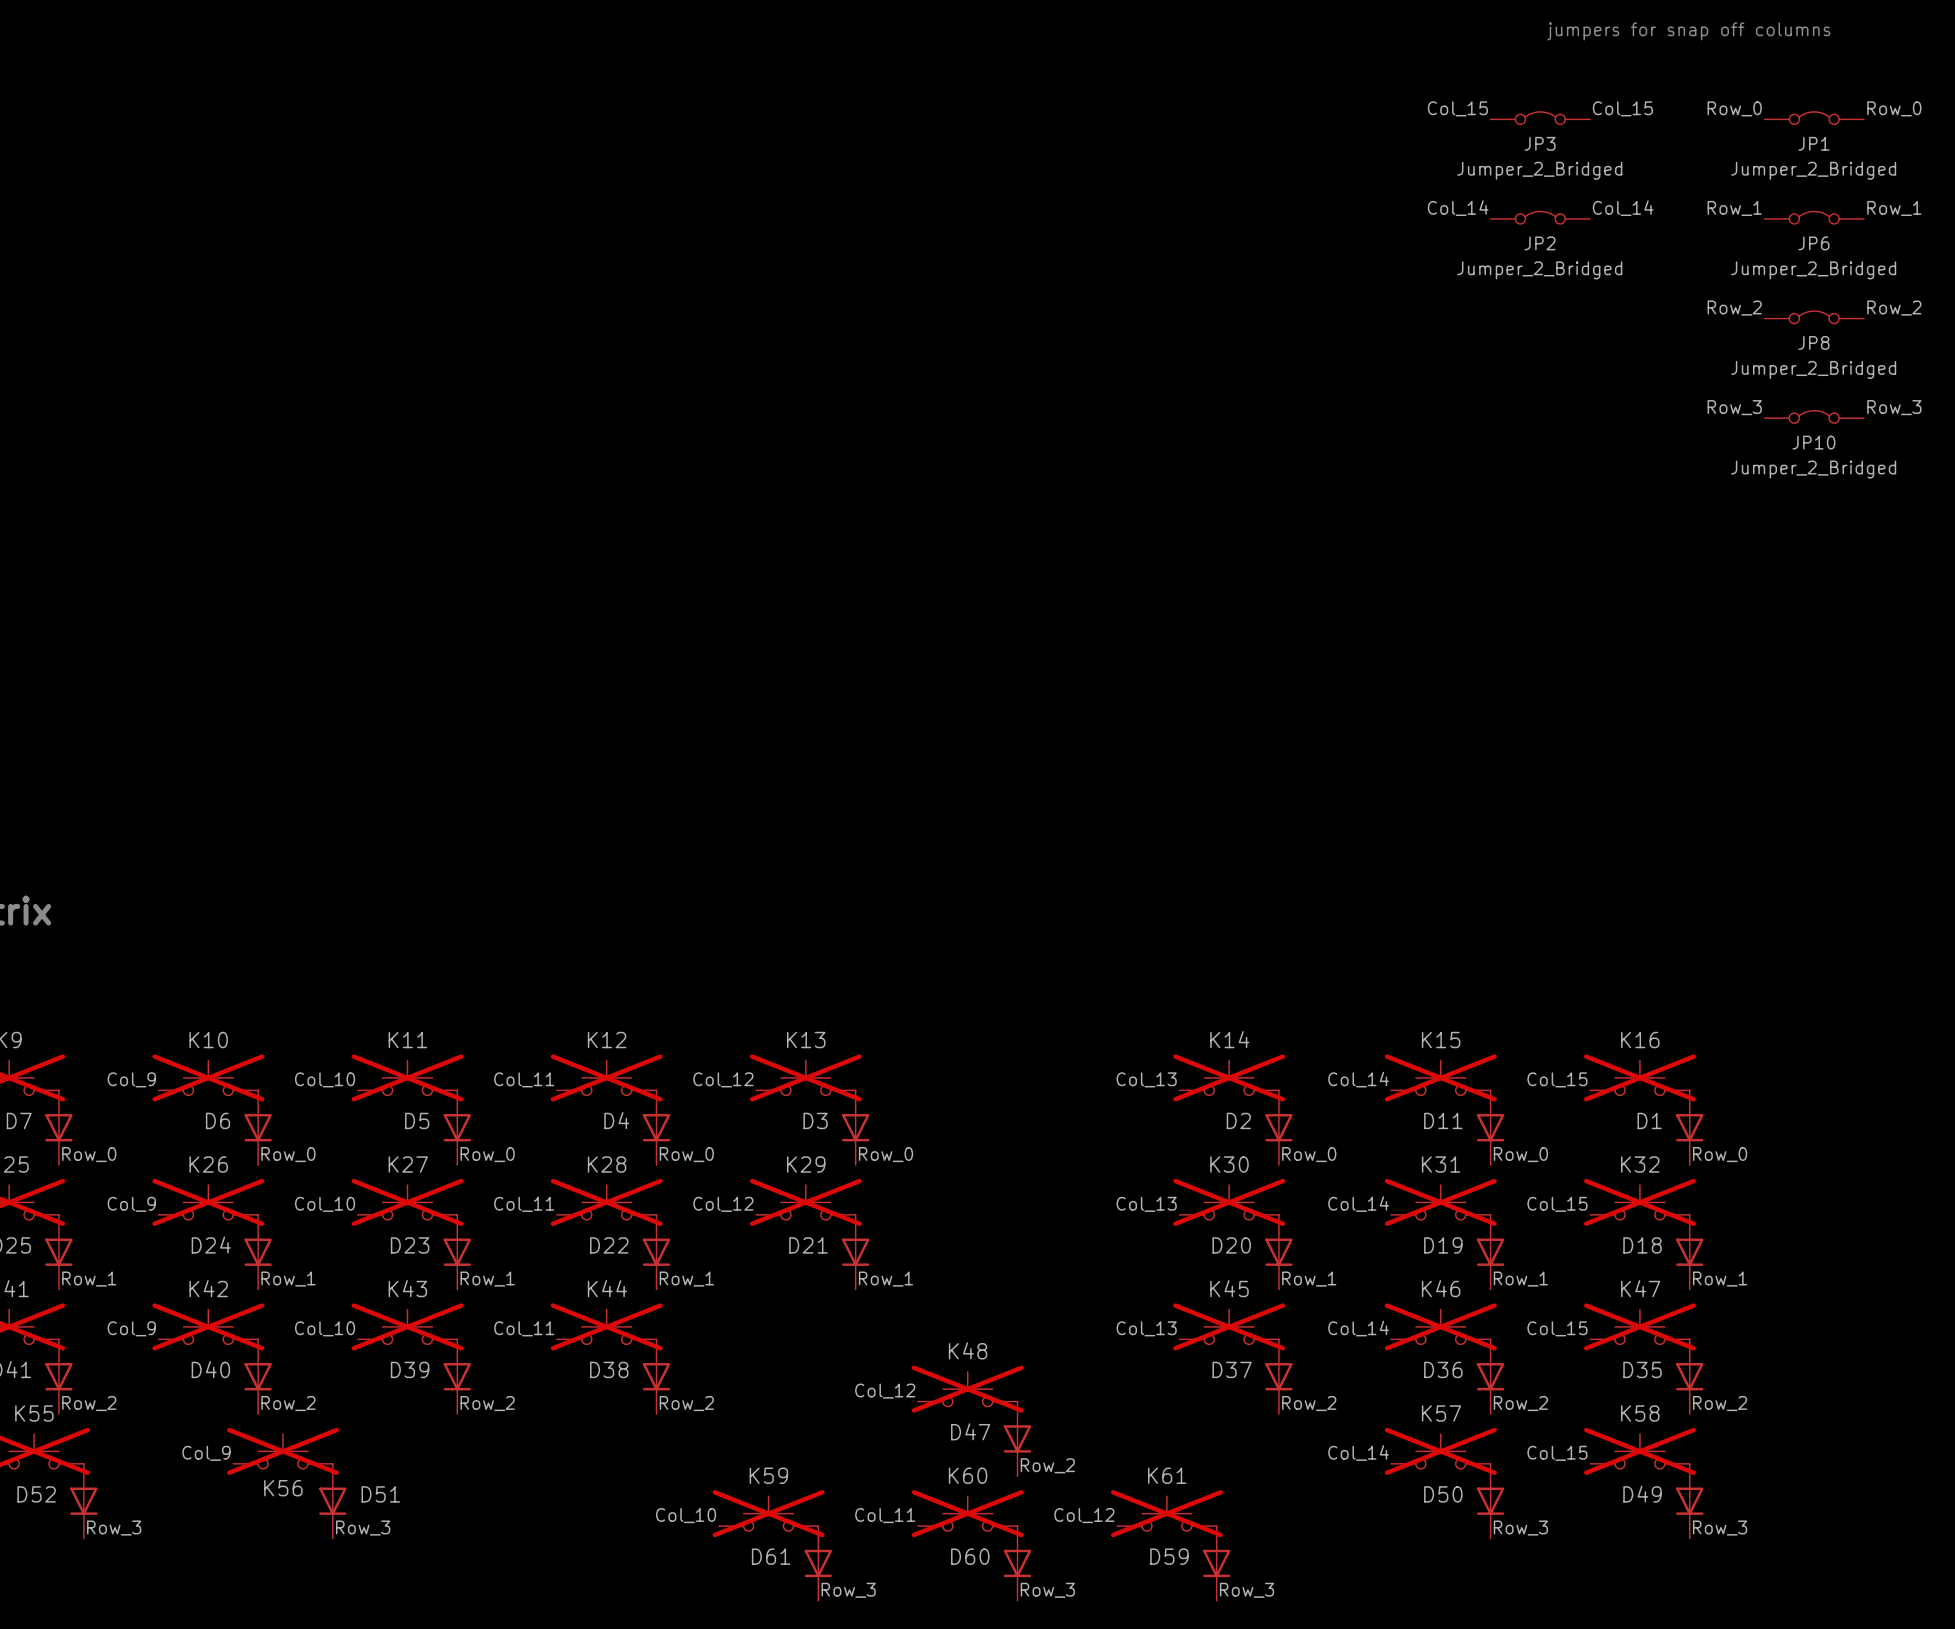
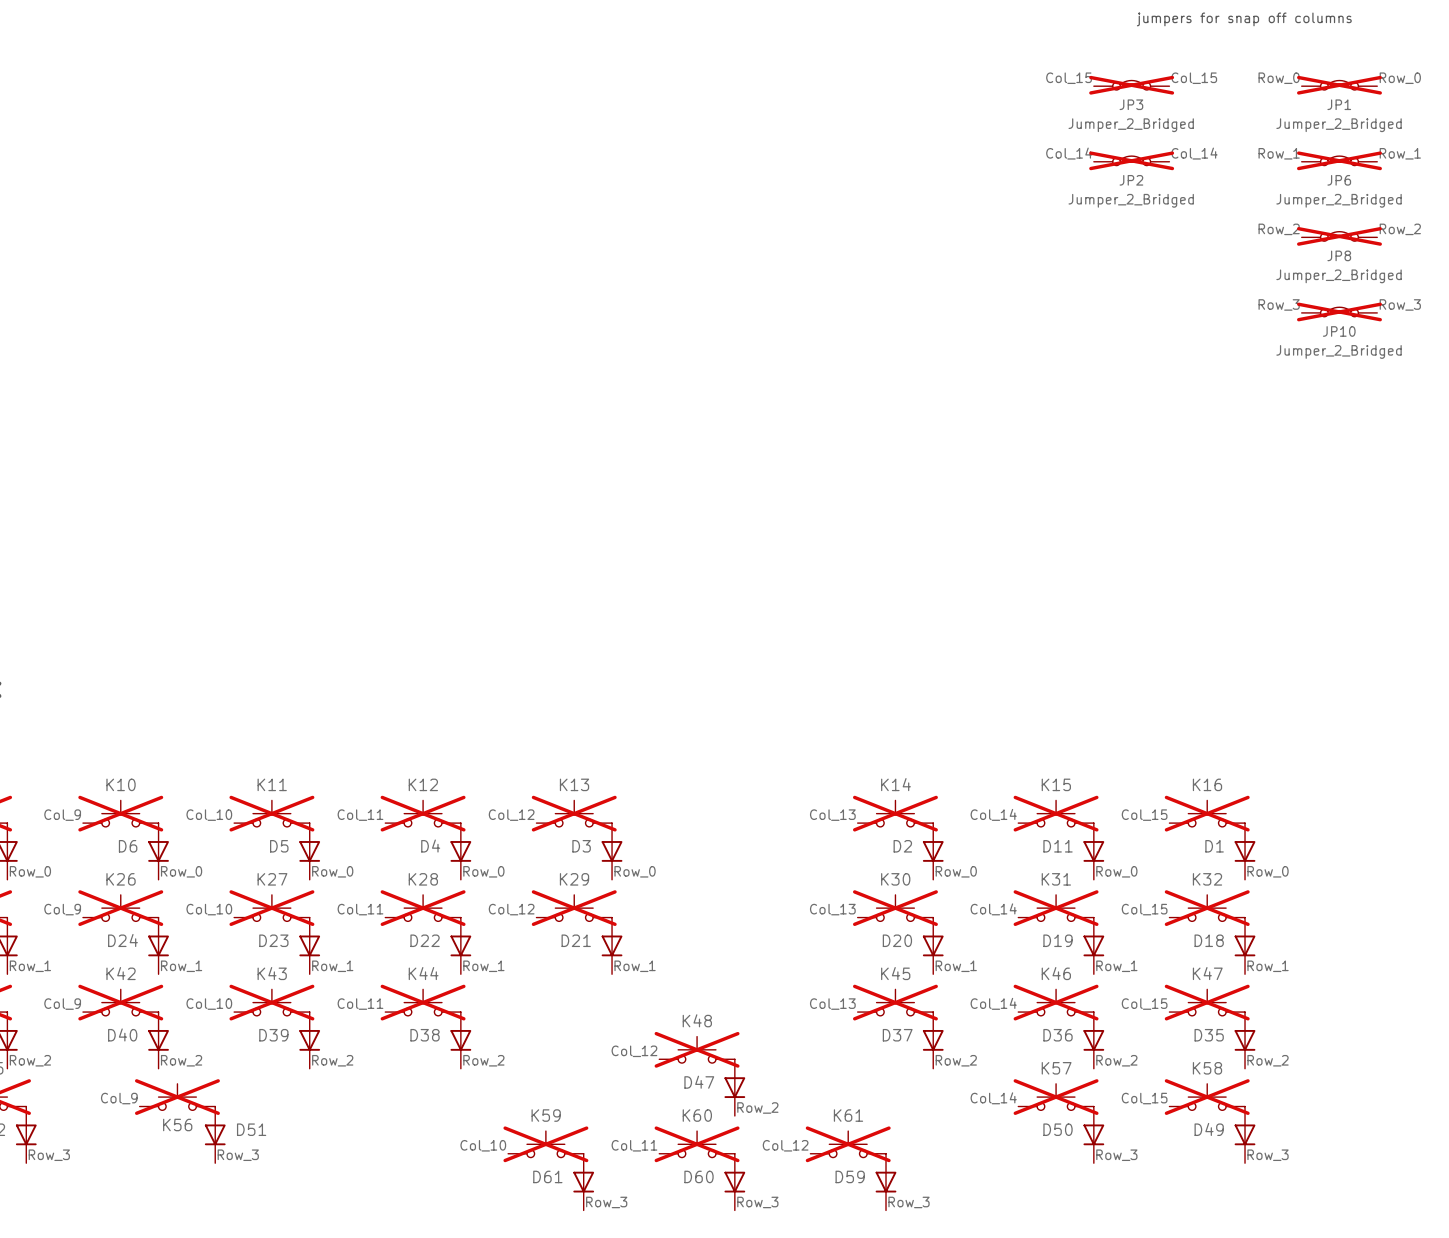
JP3 do-not-place cross: none -> (1131, 85)
JP1 do-not-place cross: none -> (1339, 85)
JP2 do-not-place cross: none -> (1131, 160)
JP6 do-not-place cross: none -> (1339, 160)
JP8 do-not-place cross: none -> (1339, 236)
JP10 do-not-place cross: none -> (1339, 311)

